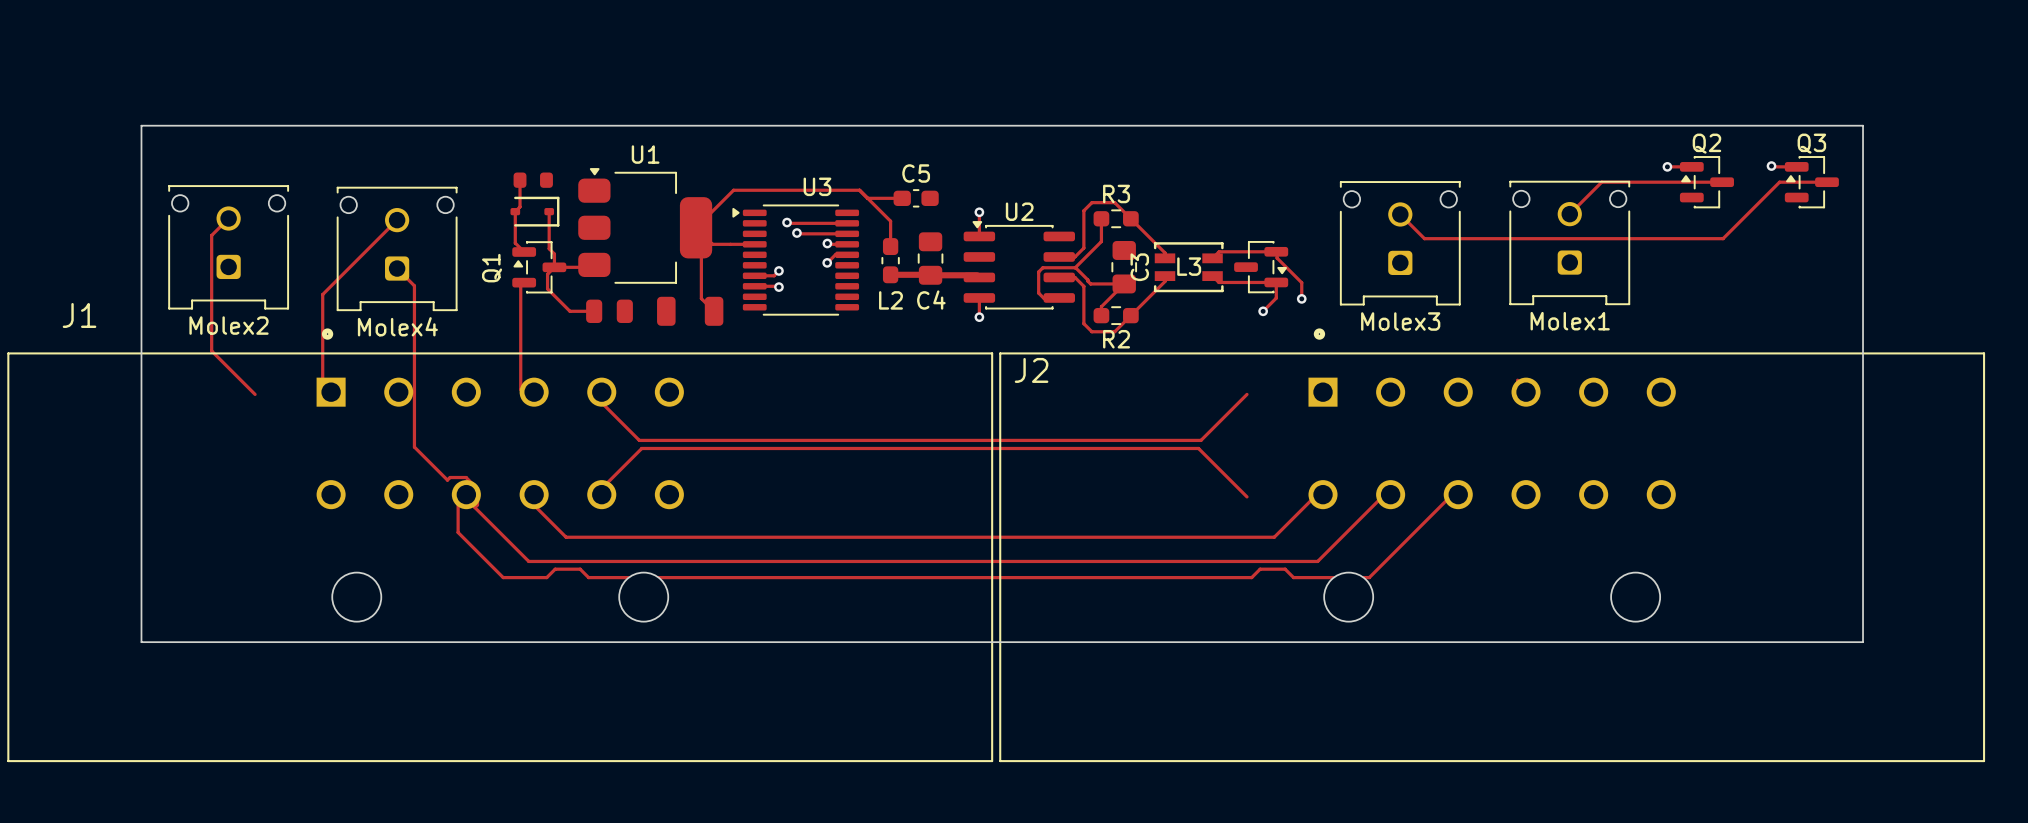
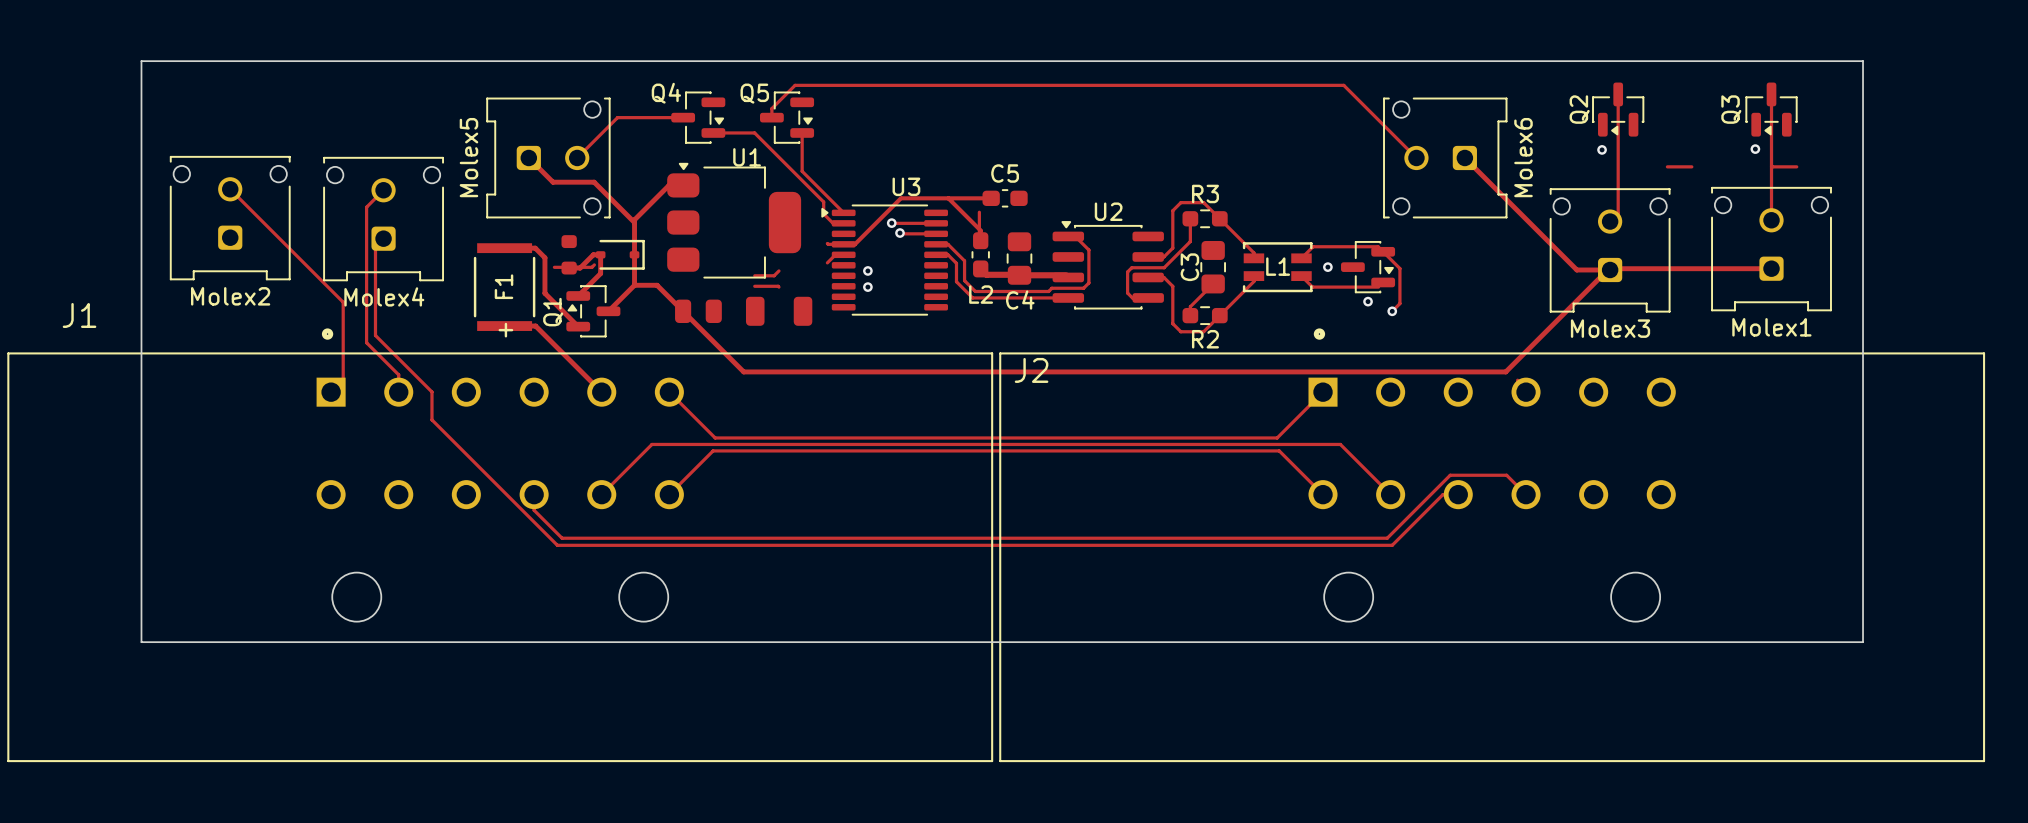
track: none -> (1618, 94) (1618, 213) (1610, 221)
track: none -> (1771, 94) (1771, 220)
track: none -> (683, 117) (617, 117) (577, 157)
Q4: none -> (698, 117)
track: none -> (771, 117) (771, 108) (795, 85) (1343, 85) (1416, 157)
Q5: none -> (787, 117)
board edge: (141, 125) (1863, 125) -> (141, 125) (141, 61) (1863, 61) (1863, 125)
track: none -> (802, 132) (802, 171) (843, 212)
via: none -> (1602, 149)
U1 name position: U1 (645, 154) -> U1 (747, 157)
track: none -> (528, 157) (553, 182) (594, 182) (634, 222)
Molex5: none -> (548, 157)
Molex6: none -> (1445, 157)
track: none -> (1464, 157) (1576, 269) (1610, 269)
via: (1667, 166) -> none
via position: (1771, 166) -> (1755, 149)
track: (520, 180) (520, 206) (515, 211) (515, 243) (524, 251) -> none
part rotation: 0° (533, 180) -> 90° clockwise (569, 254)
part position: (533, 180) -> (569, 254)
Q2 rotation: 0° (1706, 182) -> 90° counterclockwise (1618, 109)
Q2 position: (1706, 182) -> (1618, 109)
track: (1722, 182) (1601, 182) (1569, 214) -> none
Q3 rotation: 0° (1811, 182) -> 90° counterclockwise (1771, 109)
Q3 position: (1811, 182) -> (1771, 109)
track: (1826, 182) (1779, 182) (1723, 238) (1424, 238) (1400, 214) -> none
track: none -> (683, 185) (669, 185) (634, 219) (634, 285)
track: none -> (230, 189) (343, 302) (343, 380) (331, 392)
track: none -> (383, 190) (366, 207) (366, 342) (398, 374) (398, 392)
track: (867, 198) (900, 198) -> (847, 244) (854, 244) (900, 198)
track: none -> (902, 198) (991, 198)
C5 position: (916, 198) -> (1005, 198)
track: none -> (948, 198) (980, 230) (980, 240)
part position: (534, 211) -> (620, 254)
track: (549, 211) (549, 248) (554, 254) (554, 267) (547, 274) (547, 288) (569, 311) (594, 311) -> none
via: (979, 212) -> none
track: (228, 218) (211, 235) (211, 350) (255, 394) -> none
track: (1100, 218) (1101, 241) (1075, 267) -> none
R3 position: (1116, 218) -> (1205, 218)
track: none -> (1190, 218) (1190, 241) (1164, 267) (1131, 267) (1127, 271) (1127, 293) (1132, 297) (1148, 297)
track: (397, 220) (322, 294) (322, 394) -> none
track: (787, 222) (833, 223) -> (713, 132) (754, 132) (823, 202) (823, 213) (833, 223)
via: (787, 222) -> none
track: none -> (891, 223) (936, 223)
via: none -> (891, 223)
U1 position: (645, 225) -> (734, 220)
track: (701, 233) (701, 298) (714, 311) -> none
track: (796, 233) (847, 233) -> none
via: (796, 233) -> none
track: none -> (900, 233) (936, 233)
via: none -> (900, 233)
track: none -> (1068, 236) (1075, 236) (1088, 250) (1088, 282) (1083, 288) (1051, 288) (1048, 291) (975, 291) (964, 280) (964, 260) (947, 244) (936, 244)
track: none -> (383, 238) (375, 246) (375, 335) (431, 392) (431, 419) (557, 545) (1392, 545) (1442, 494) (1458, 494)
Molex1 position: (1569, 242) -> (1771, 249)
via: (827, 243) -> none
Molex3 position: (1400, 243) -> (1610, 250)
track: (754, 244) (712, 244) (696, 227) (733, 190) (859, 190) (890, 221) (890, 246) -> none
Molex2 position: (228, 247) -> (230, 218)
Molex4 position: (397, 248) -> (383, 219)
track: none -> (504, 248) (535, 248) (544, 257) (544, 293) (578, 326)
track: (1059, 256) (1075, 256) (1083, 248) (1083, 210) (1091, 202) (1114, 202) (1165, 252) (1165, 258) -> (1148, 256) (1163, 256) (1172, 248) (1172, 210) (1180, 202) (1203, 202) (1253, 252) (1253, 258)
C4 position: (930, 258) -> (1019, 258)
track: (1212, 258) (1219, 251) (1276, 251) (1277, 258) (1301, 282) (1301, 298) -> none
track: none -> (1301, 258) (1313, 246) (1378, 246) (1399, 268) (1399, 303) (1392, 311)
U3 position: (795, 260) -> (884, 260)
L2 position: (890, 260) -> (980, 254)
via: (827, 262) -> none
U2 position: (1019, 265) -> (1108, 265)
Q1 position: (539, 267) -> (593, 311)
C3 position: (1124, 267) -> (1213, 267)
C3 name position: C3 (1139, 267) -> C3 (1189, 267)
L3: (1188, 267) -> none
part position: (1261, 267) -> (1368, 267)
L1: none -> (1277, 267)
via: none -> (1327, 267)
track: (397, 268) (414, 285) (414, 447) (447, 480) (450, 477) (466, 477) (477, 488) (477, 504) (474, 507) (528, 561) (1317, 561) (1382, 496) -> none
Q1 name position: Q1 (492, 268) -> Q1 (553, 312)
track: none -> (569, 268) (580, 268) (593, 254) (600, 254) (600, 273) (578, 295)
track: none -> (980, 268) (986, 274) (1019, 274)
track: none -> (1771, 268) (1609, 268) (1505, 371) (743, 371) (657, 285) (634, 285)
via: (778, 270) -> none
via: none -> (867, 270)
track: (890, 274) (977, 275) (979, 277) -> none
track: none -> (1019, 275) (1066, 275)
track: (1165, 276) (1165, 281) (1114, 331) (1091, 331) (1083, 323) (1083, 286) (1075, 277) (1059, 277) -> (1253, 276) (1253, 281) (1203, 331) (1180, 331) (1172, 323) (1172, 286) (1163, 277) (1148, 277)
track: (1207, 276) (1212, 276) (1218, 282) (1276, 282) (1276, 298) (1263, 311) -> none
track: none -> (1301, 276) (1312, 287) (1378, 287)
track: (524, 282) (520, 286) (520, 389) (525, 394) -> none
track: none -> (1213, 283) (1190, 306) (1190, 315)
track: none -> (634, 285) (608, 311)
F1: none -> (504, 287)
via: (778, 287) -> none
via: none -> (867, 287)
part footprint: [657, 296, 724, 326] -> [675, 299, 722, 324]
track: (979, 297) (979, 317) -> none
track: (1043, 297) (1038, 293) (1038, 271) (1042, 267) (1075, 267) (1090, 283) (1124, 283) (1101, 306) (1101, 315) -> (1043, 297) (972, 297) (956, 281) (956, 263) (947, 254) (936, 254)
via: (1301, 298) -> none
via: none -> (1368, 301)
part: (609, 311) -> none
part: none -> (779, 311)
via: (1263, 311) -> none
via: none -> (1392, 311)
R2 position: (1116, 315) -> (1205, 315)
via: (979, 317) -> none
track: none -> (505, 326) (535, 326) (601, 392)
track: none -> (669, 392) (715, 437) (1277, 437) (1323, 392)
track: (593, 394) (639, 440) (1201, 440) (1246, 394) -> none
track: none -> (534, 494) (534, 510) (562, 538) (1387, 538) (1450, 475) (1506, 475) (1526, 494)
track: none -> (601, 494) (651, 444) (1340, 444) (1390, 494)
track: none -> (669, 494) (713, 450) (1279, 450) (1323, 494)
track: (458, 496) (458, 532) (503, 577) (546, 577) (555, 569) (580, 569) (588, 577) (1251, 577) (1260, 569) (1285, 569) (1293, 577) (1369, 577) (1450, 496) -> none
track: (525, 496) (566, 537) (1274, 537) (1314, 496) -> none
track: (593, 496) (641, 448) (1198, 448) (1246, 496) -> none

